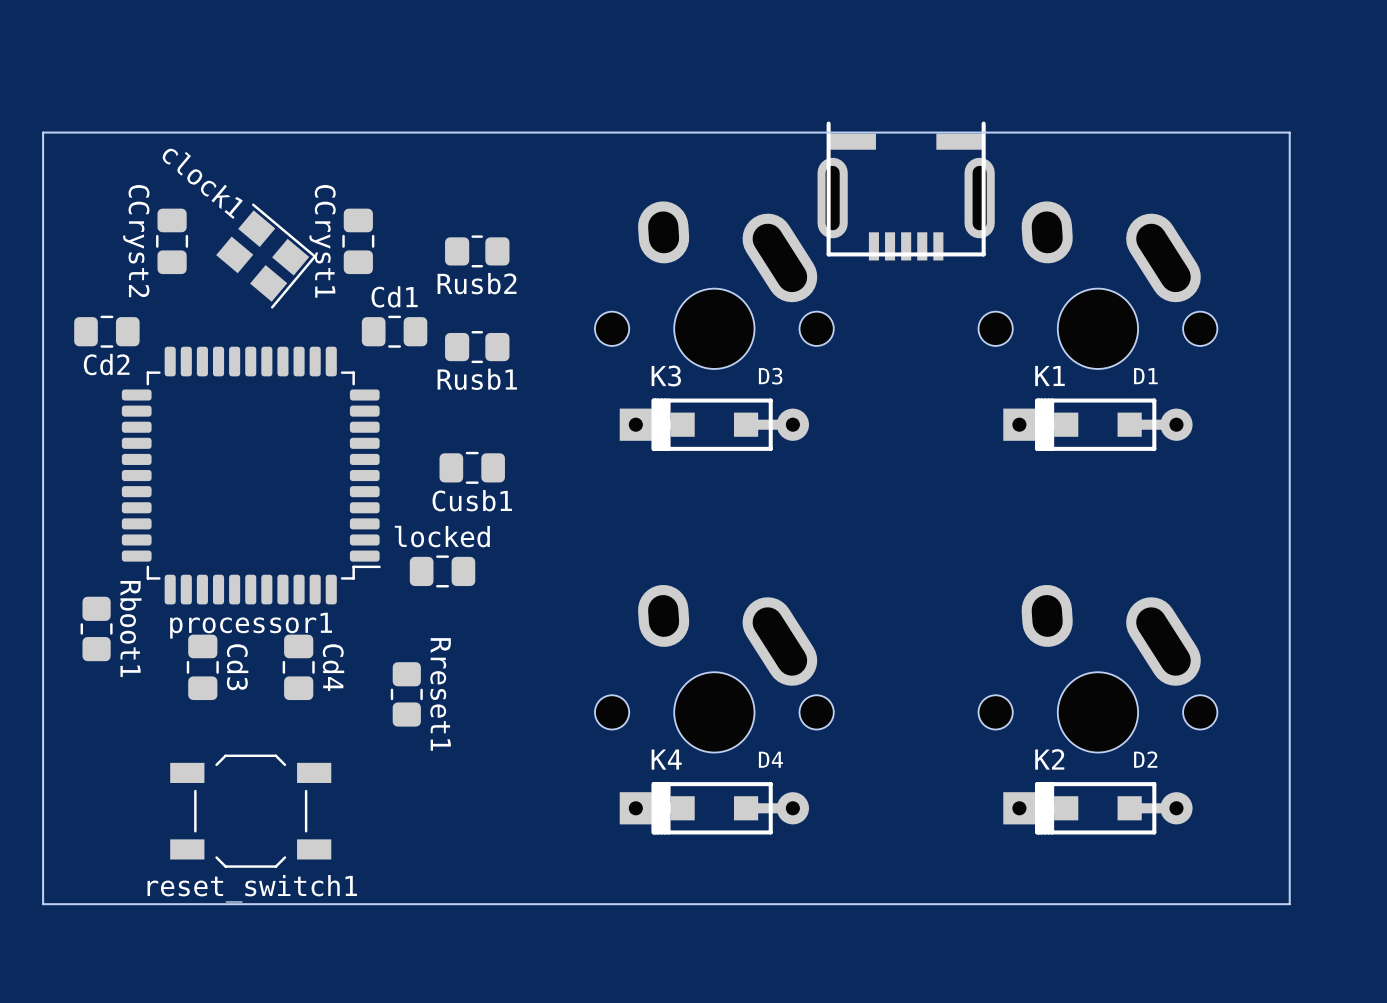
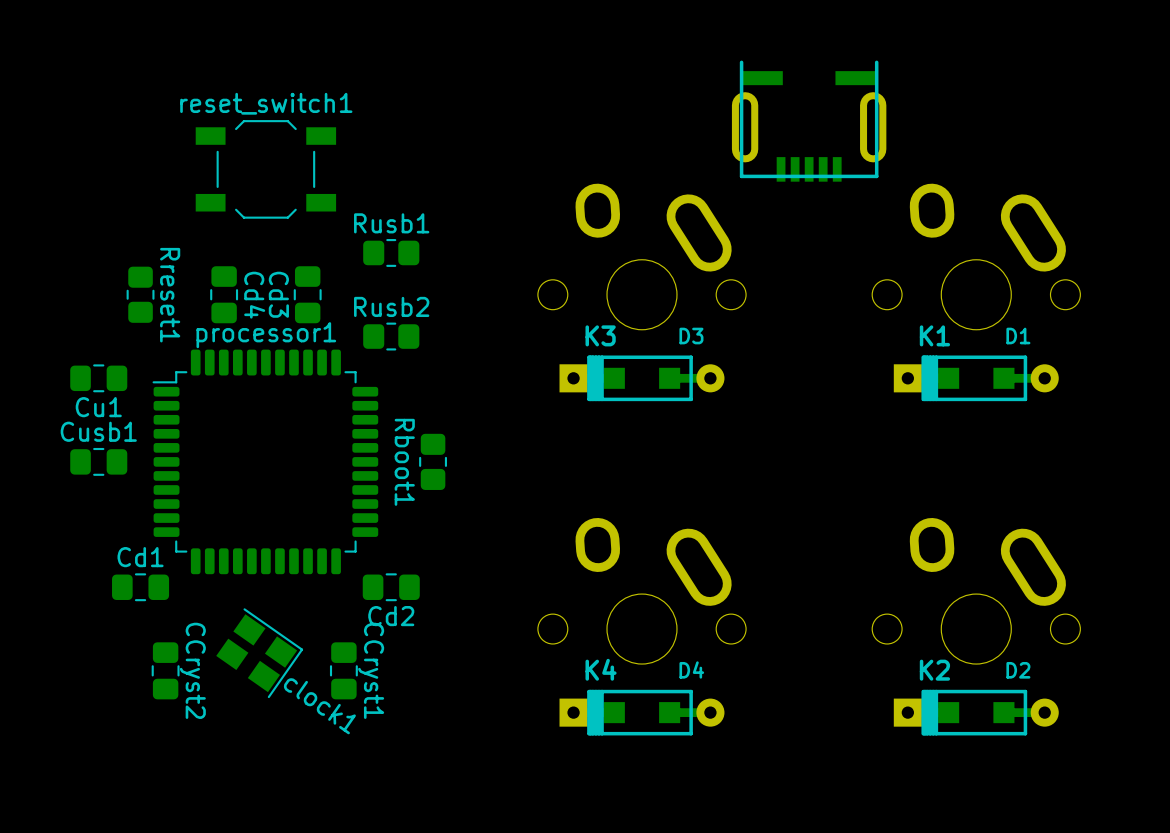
board edge: (1289, 132) (43, 132) (43, 904) (1289, 904) (1289, 132) -> none
clock1 name position: clock1 (202, 183) -> clock1 (319, 706)
part position: (906, 191) -> (809, 121)
CCryst2 name position: CCryst2 (136, 241) -> CCryst2 (192, 670)
CCryst2 position: (172, 241) -> (165, 670)
CCryst1 name position: CCryst1 (322, 241) -> CCryst1 (371, 670)
CCryst1 position: (358, 241) -> (343, 670)
Rusb2 position: (477, 251) -> (391, 336)
clock1 rotation: 0° (266, 256) -> 5° counterclockwise (259, 653)
clock1 position: (266, 256) -> (259, 653)
Rusb2 name position: Rusb2 (477, 283) -> Rusb2 (391, 306)
Cd2 position: (106, 331) -> (391, 587)
Cd1 position: (394, 331) -> (140, 587)
Rusb1 position: (477, 347) -> (391, 252)
Rusb1 name position: Rusb1 (477, 379) -> Rusb1 (391, 223)
Cu1: none -> (98, 378)
Cusb1 position: (472, 467) -> (98, 461)
processor1 rotation: 0° (251, 475) -> 180° (265, 461)
Cusb1 name position: Cusb1 (472, 500) -> Cusb1 (98, 431)
locked: (442, 571) -> none
Rboot1 position: (96, 628) -> (433, 461)
Rboot1 name position: Rboot1 (130, 628) -> Rboot1 (404, 462)
Cd3 position: (202, 667) -> (307, 294)
Cd3 name position: Cd3 (237, 667) -> Cd3 (278, 294)
Cd4 position: (298, 667) -> (224, 294)
Rreset1 position: (406, 694) -> (140, 294)
reset_switch1 position: (250, 811) -> (265, 169)
reset_switch1 name position: reset_switch1 (252, 888) -> reset_switch1 (266, 103)

